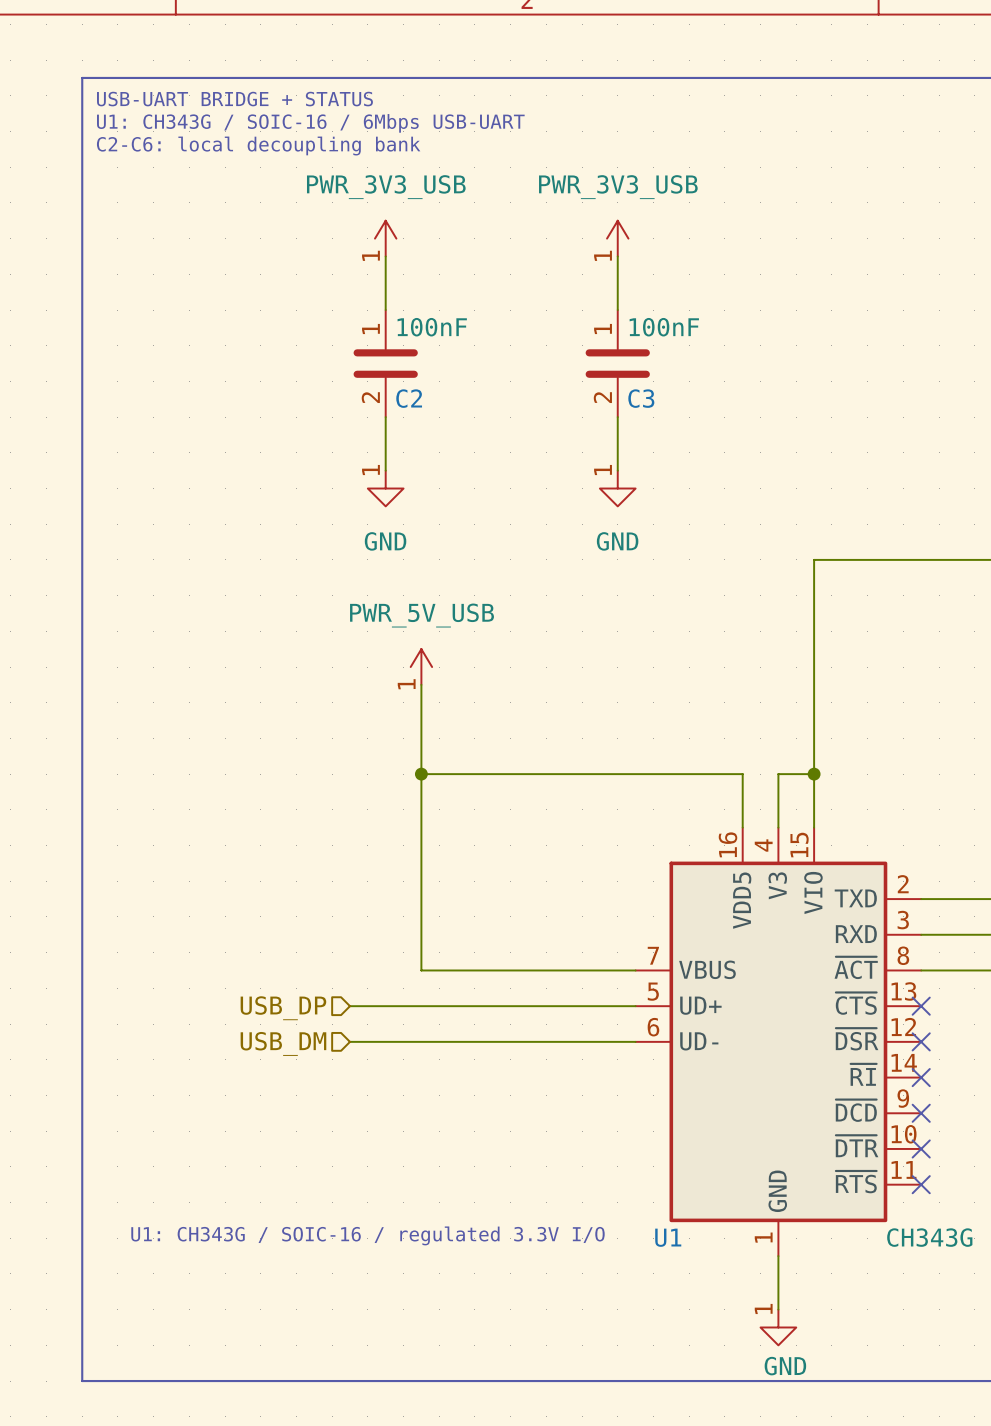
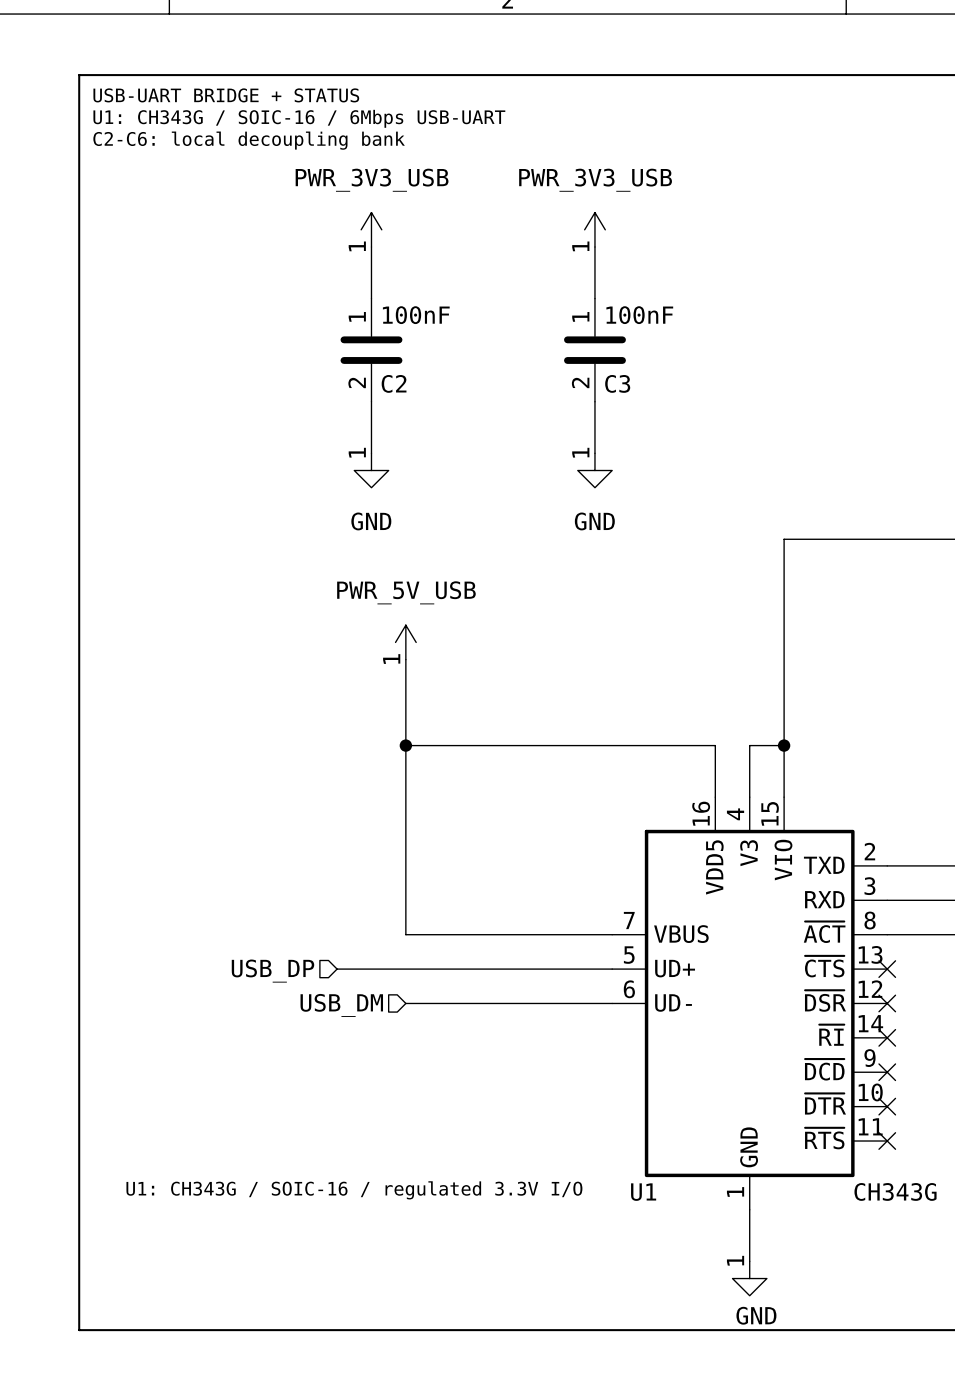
wire: (349, 1041) (421, 1041) -> none
hierarchical label position: USB_DM (283, 1043) -> USB_DM (341, 1005)

